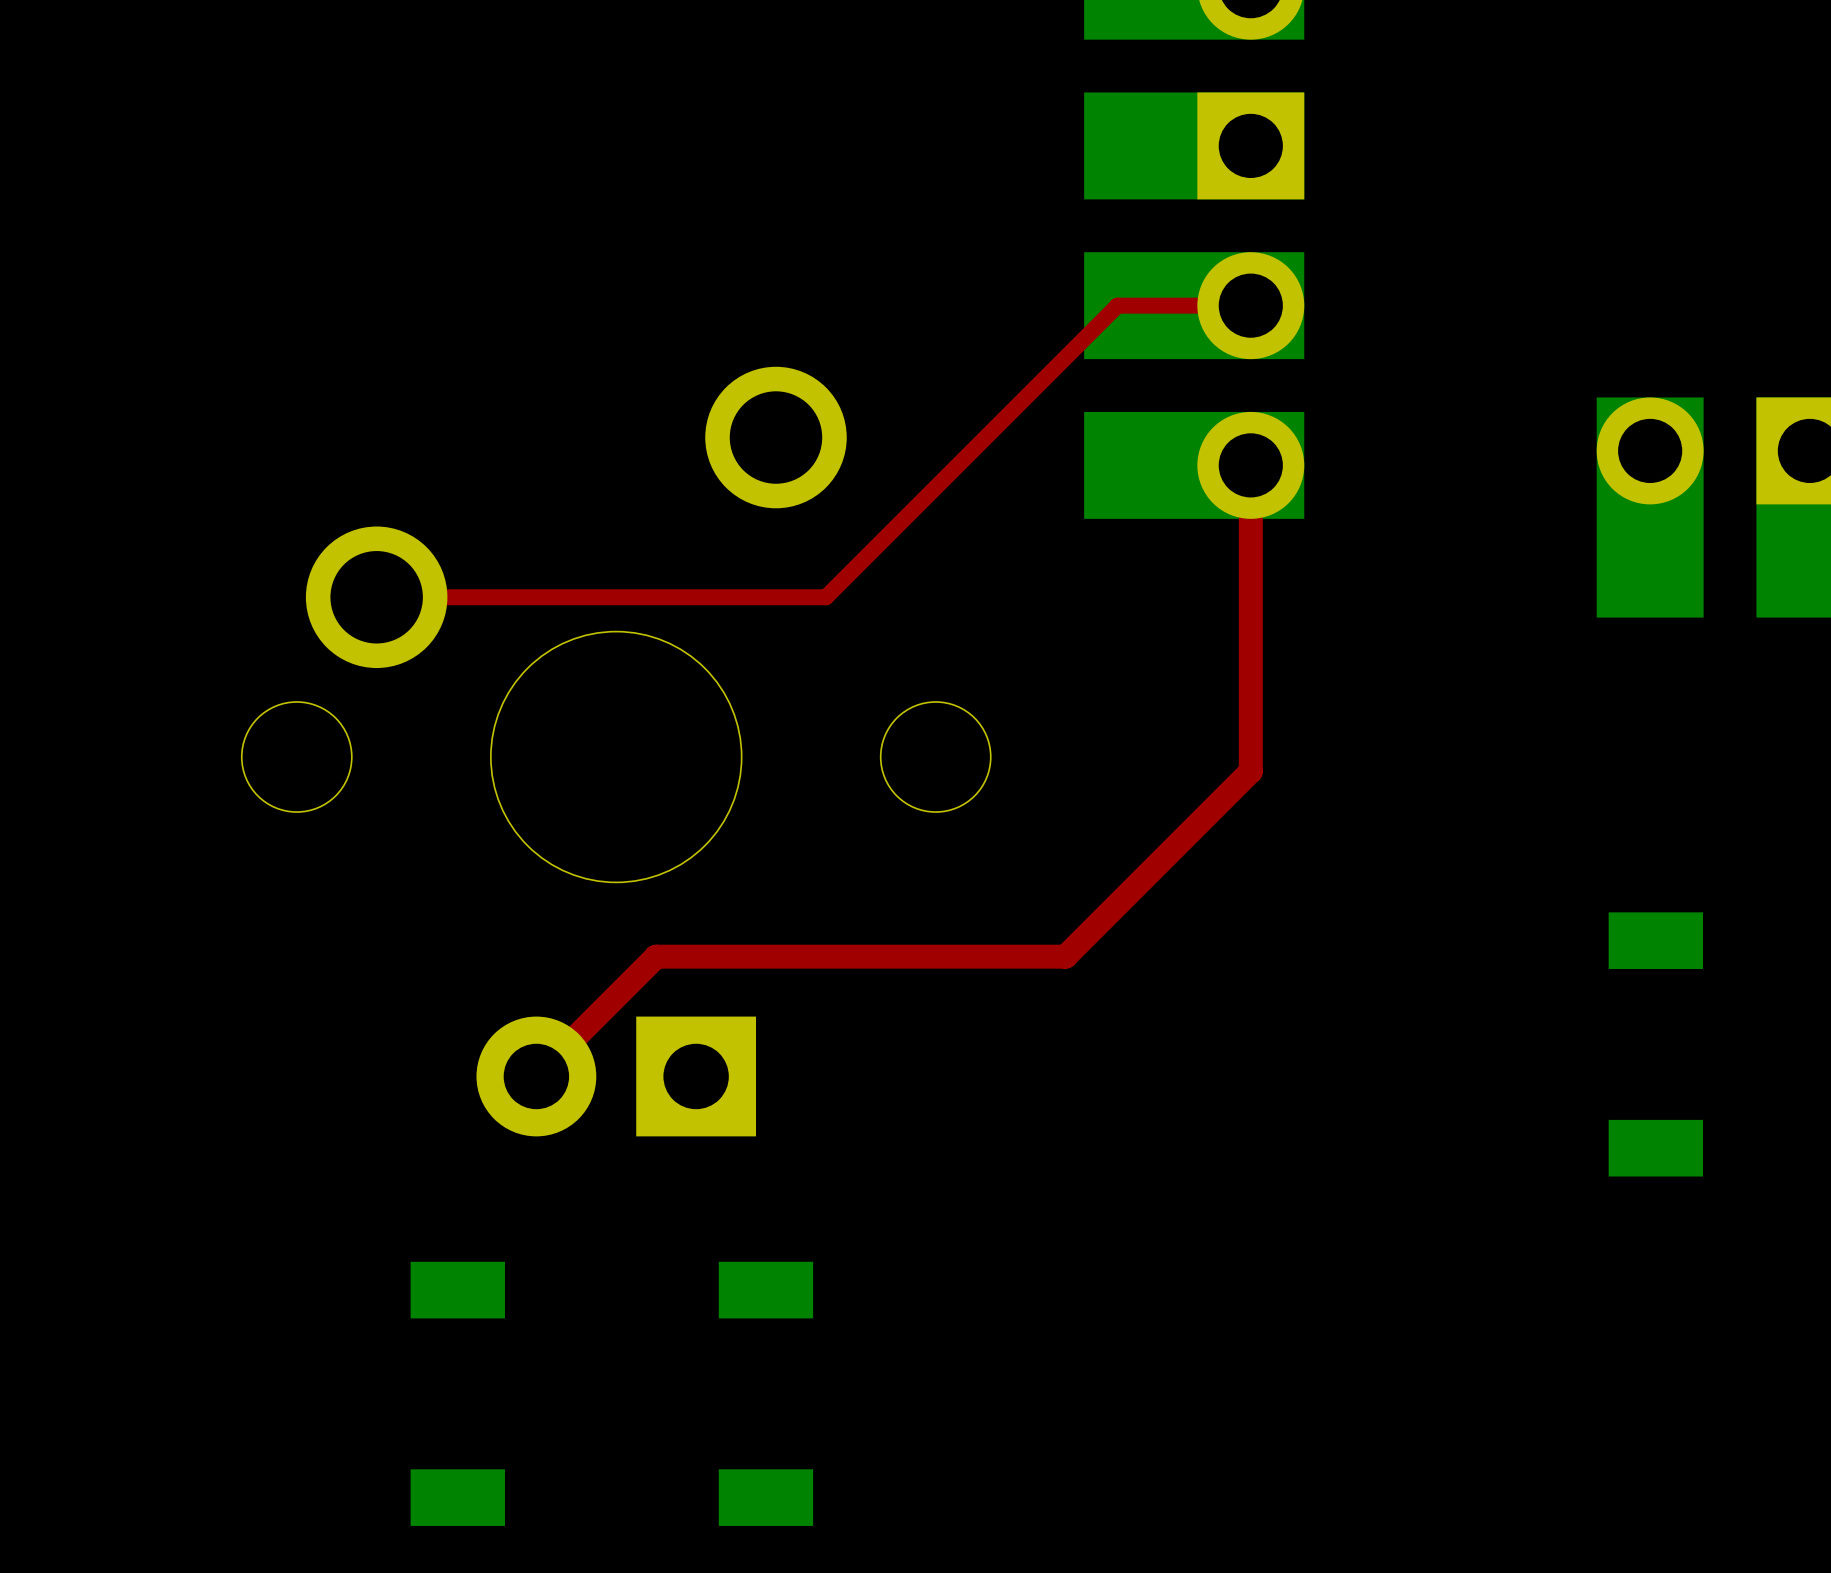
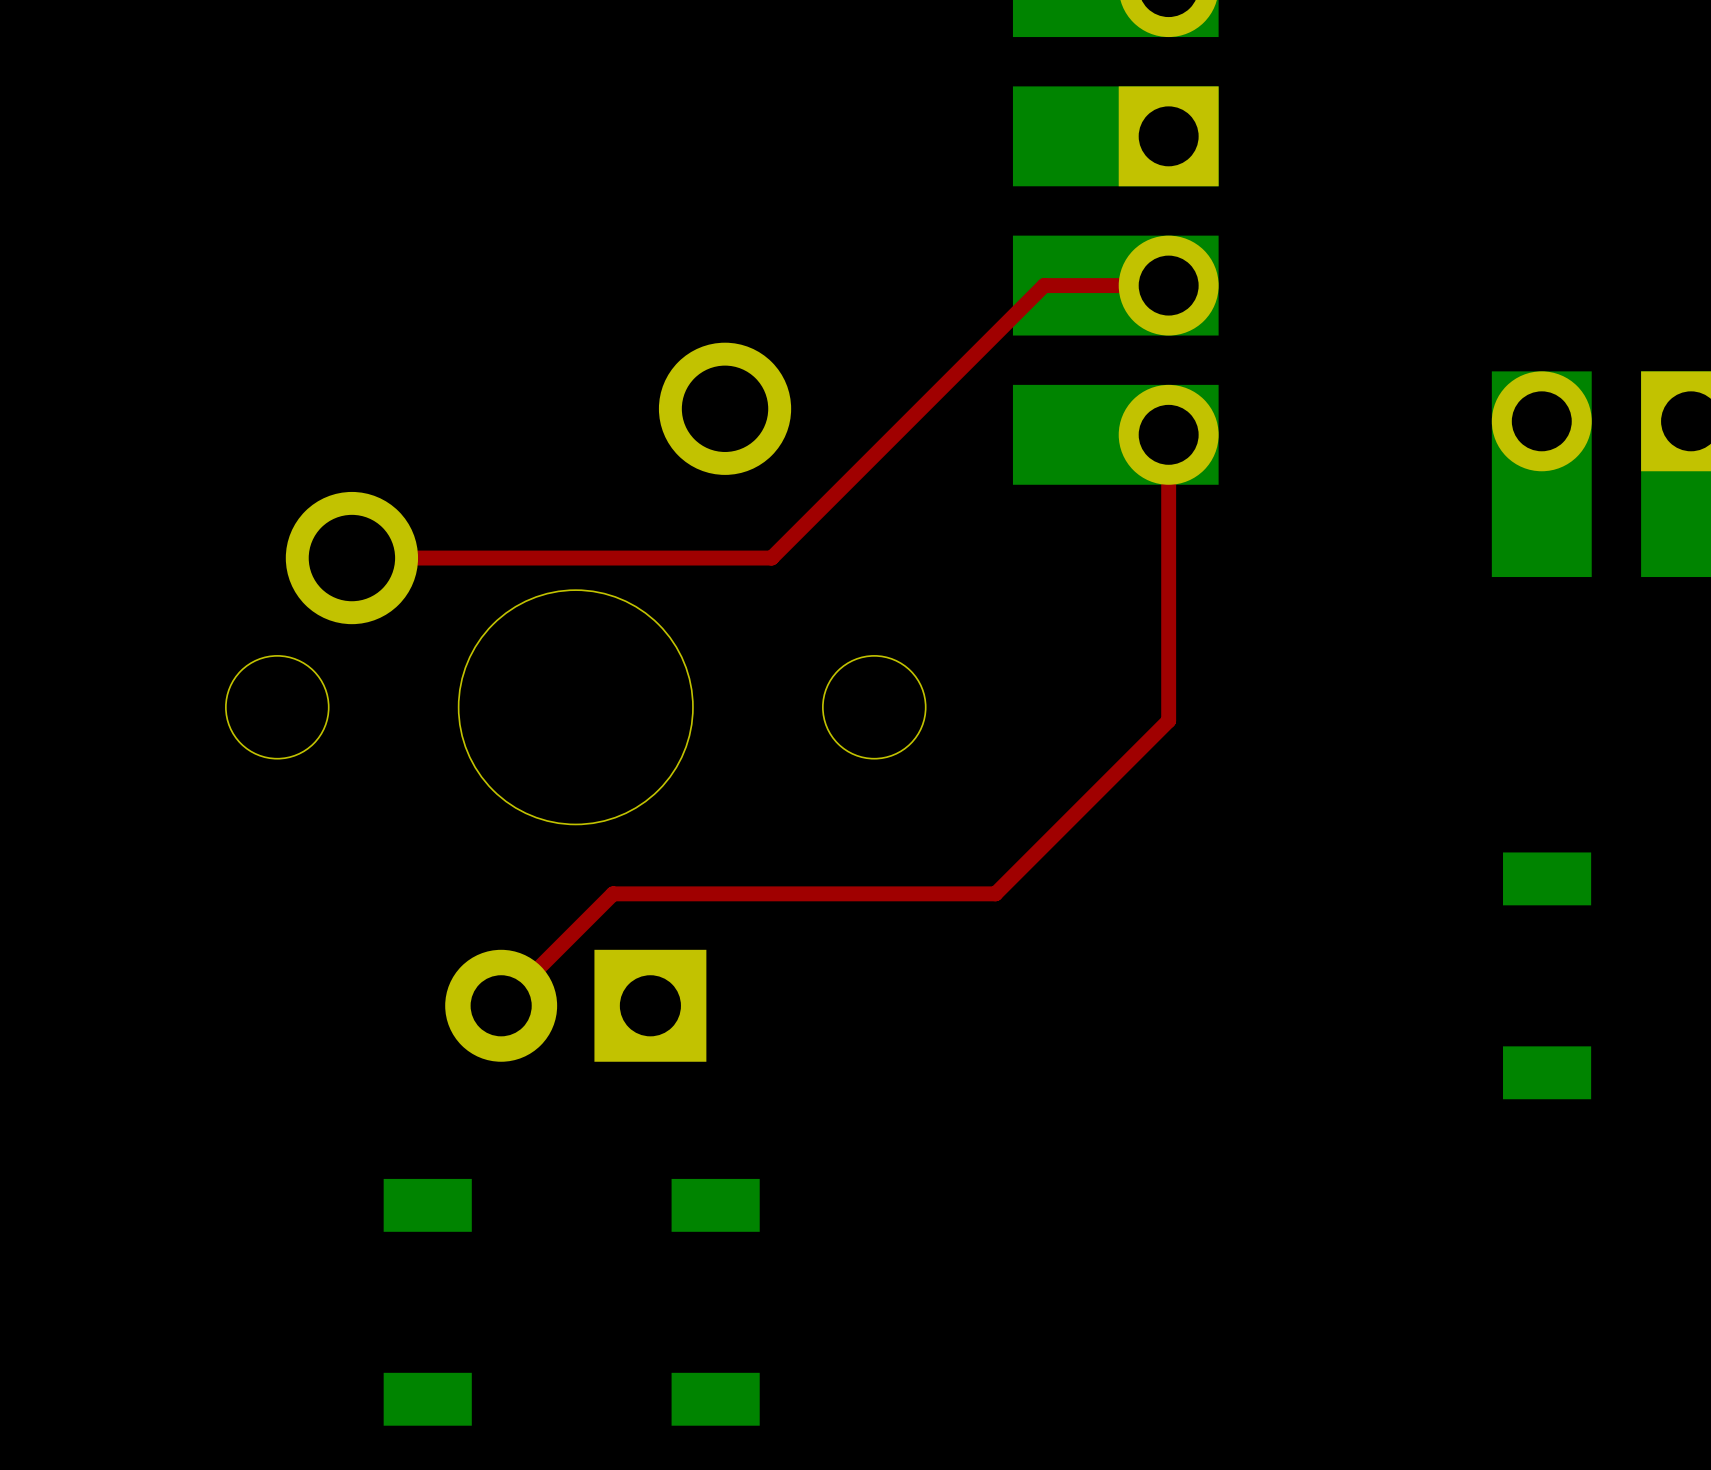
top track width: thick (1250, 465) (1250, 771) (1065, 956) (656, 956) (536, 1076) -> thin (1168, 434) (1168, 720) (995, 893) (613, 893) (501, 1005)

